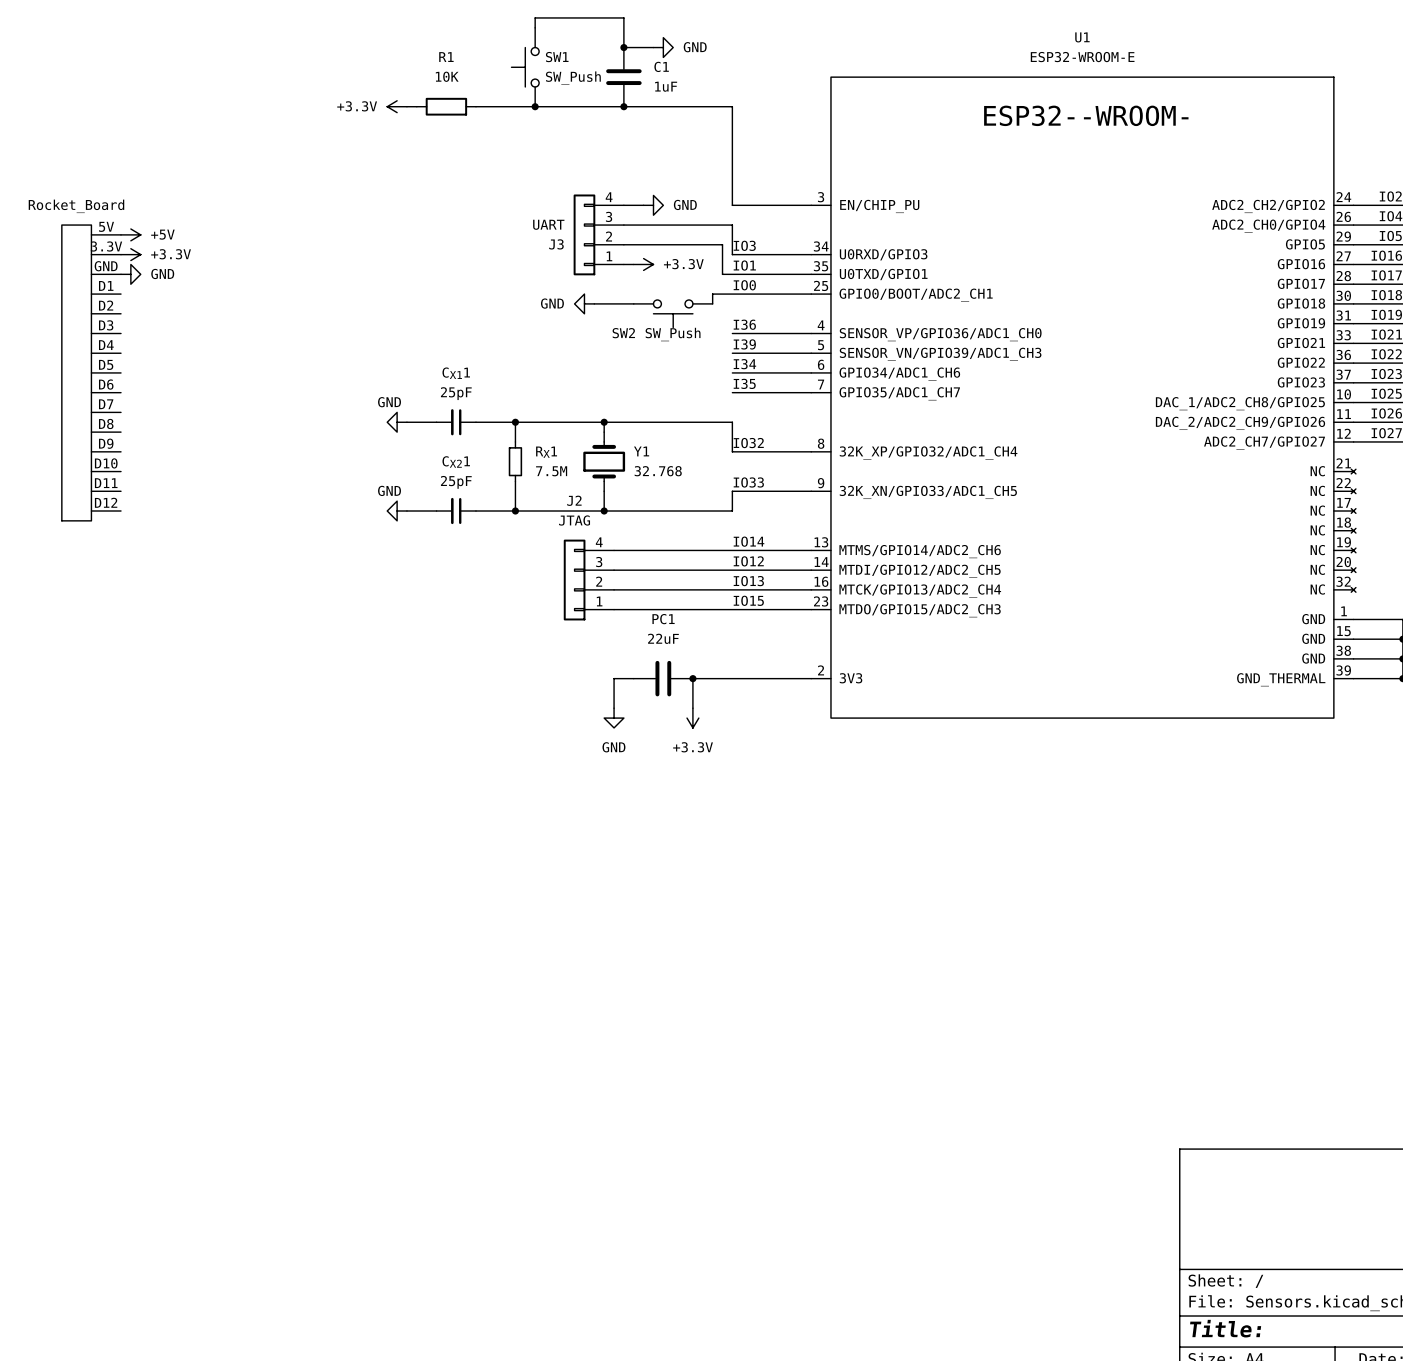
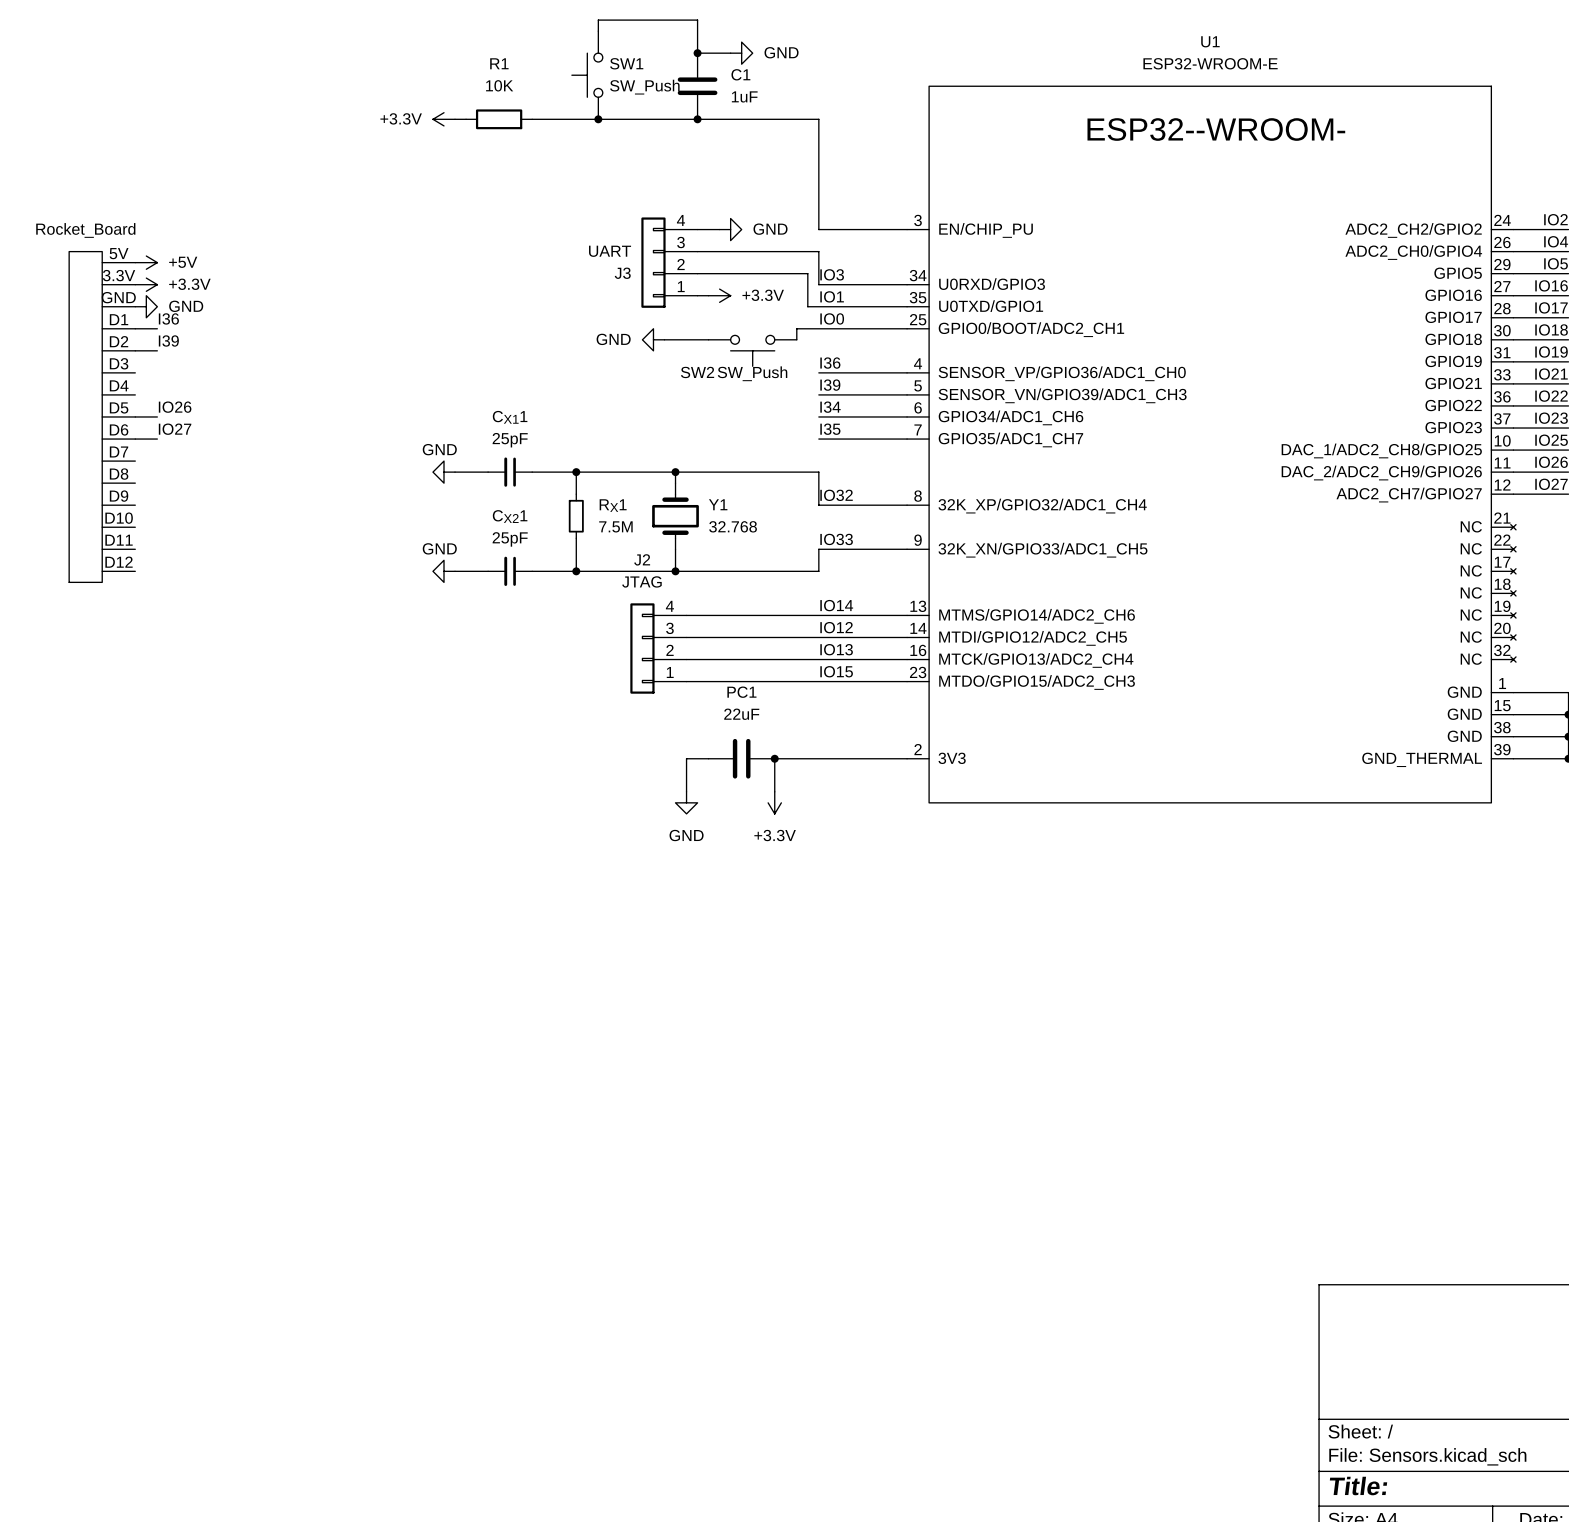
label: none -> I36 (168, 318)
wire: none -> (135, 328) (157, 328)
label: none -> I39 (168, 340)
wire: none -> (135, 350) (157, 350)
label: none -> IO26 (175, 407)
wire: none -> (135, 416) (157, 416)
label: none -> IO27 (175, 429)
wire: none -> (135, 439) (157, 439)

